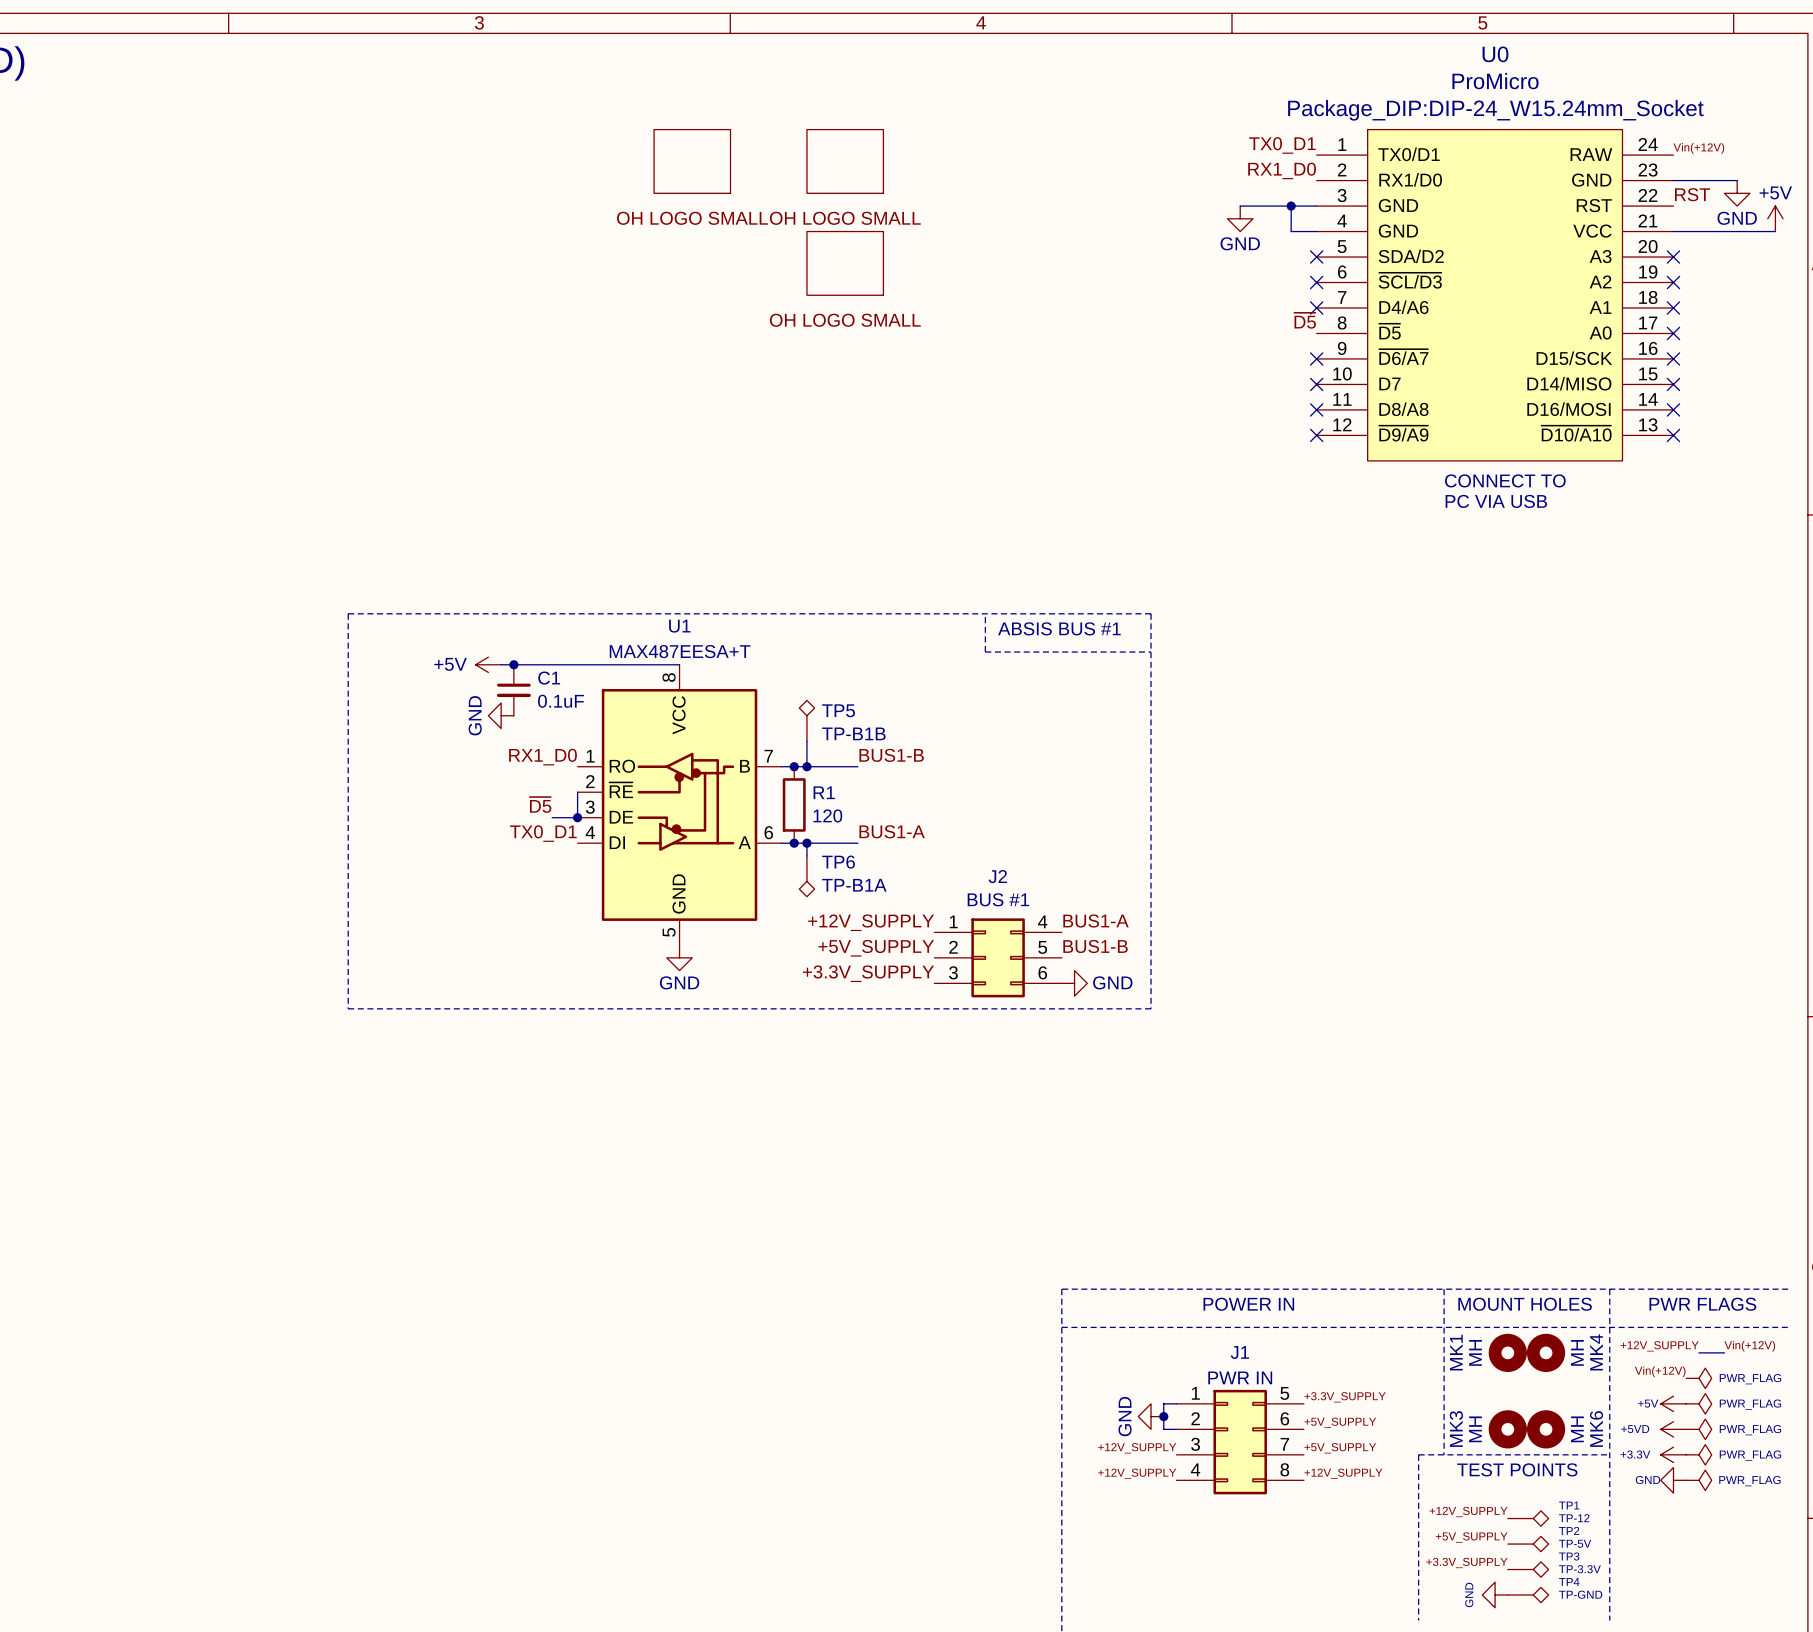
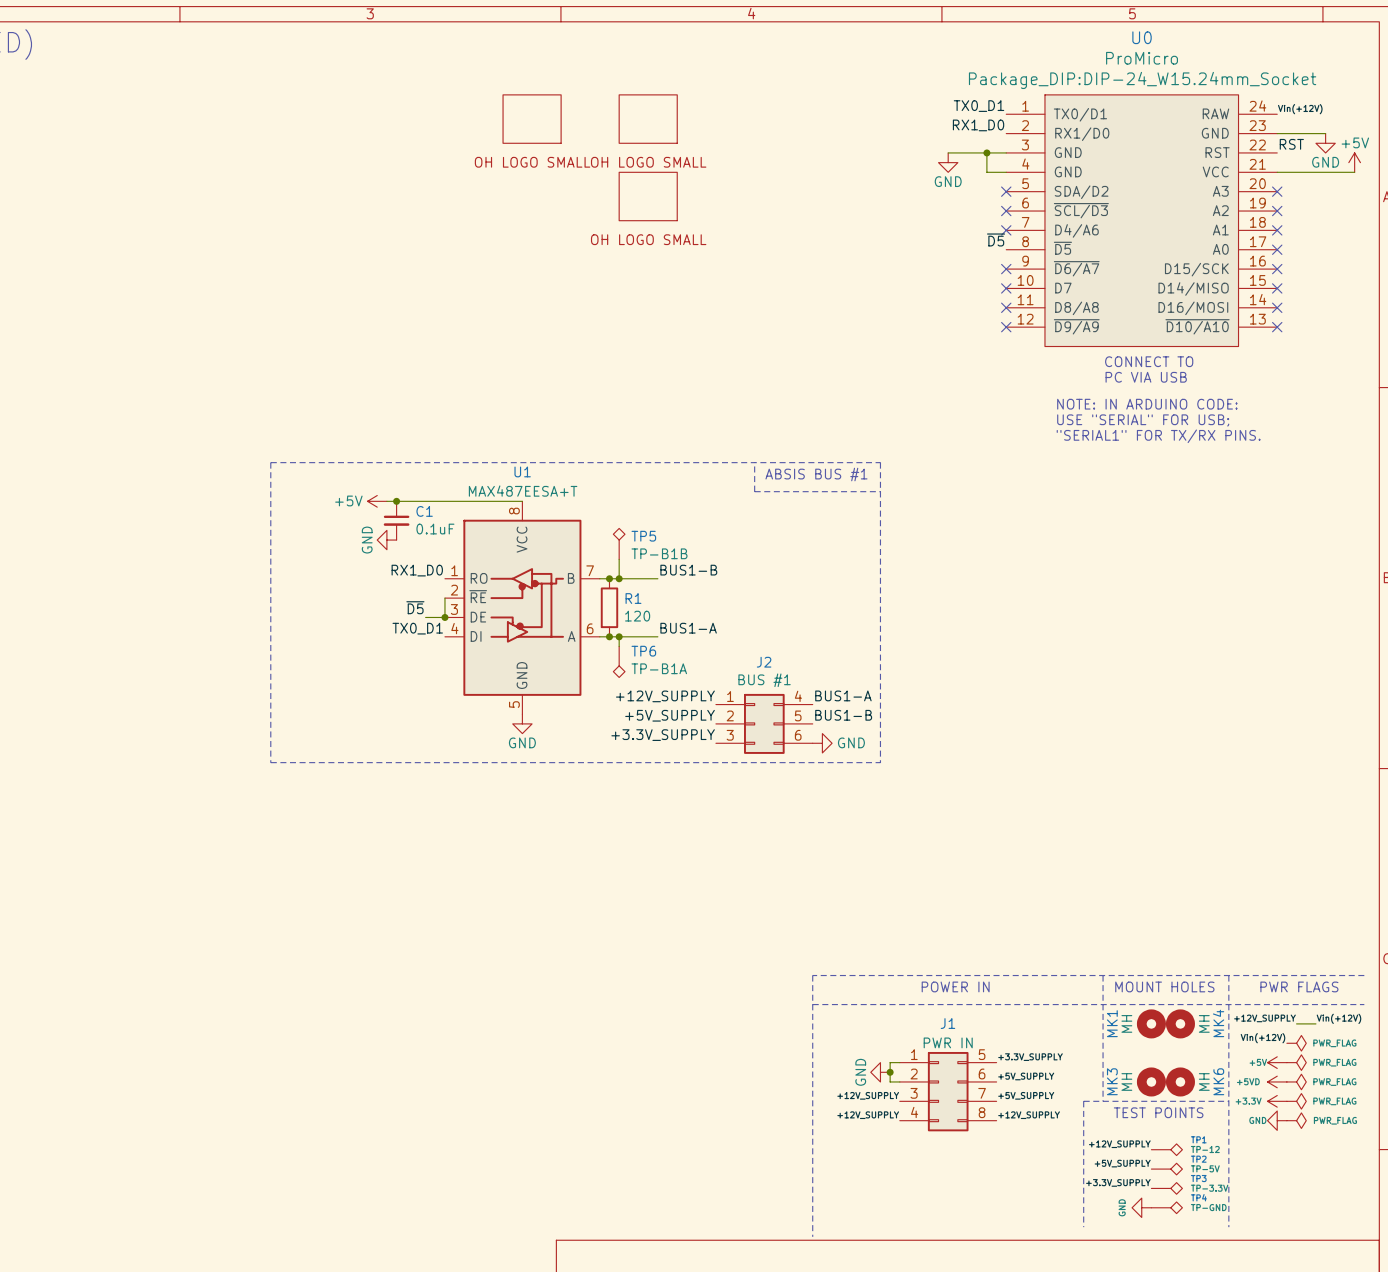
text: none -> NOTE: IN ARDUINO CODE: (1147, 404)
text: none -> USE "SERIAL" FOR USB; (1143, 420)
text: none -> "SERIAL1" FOR TX/RX PINS. (1158, 436)

